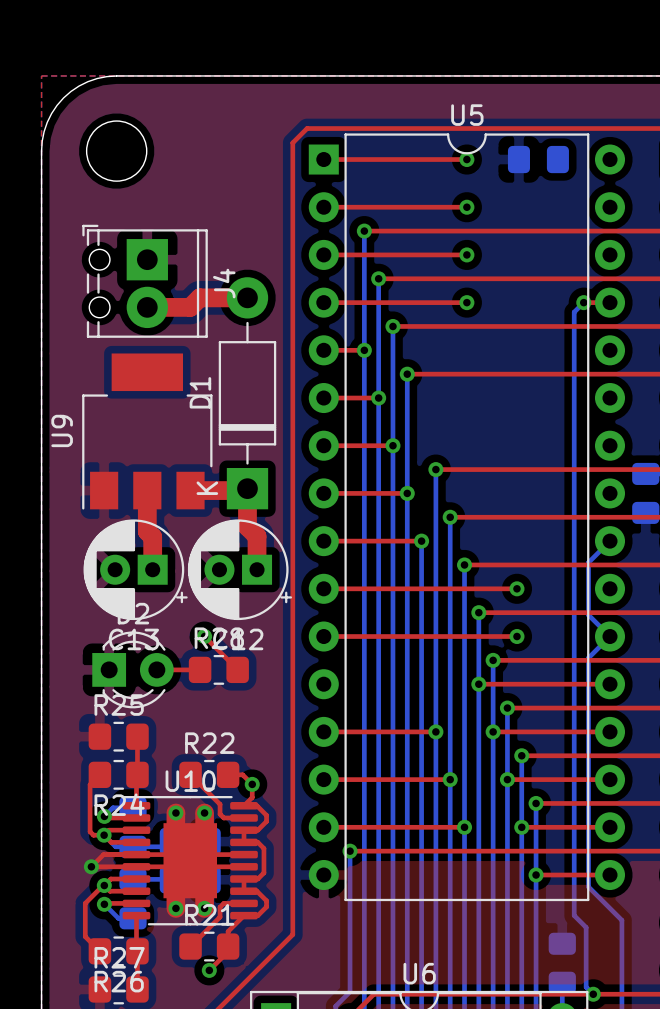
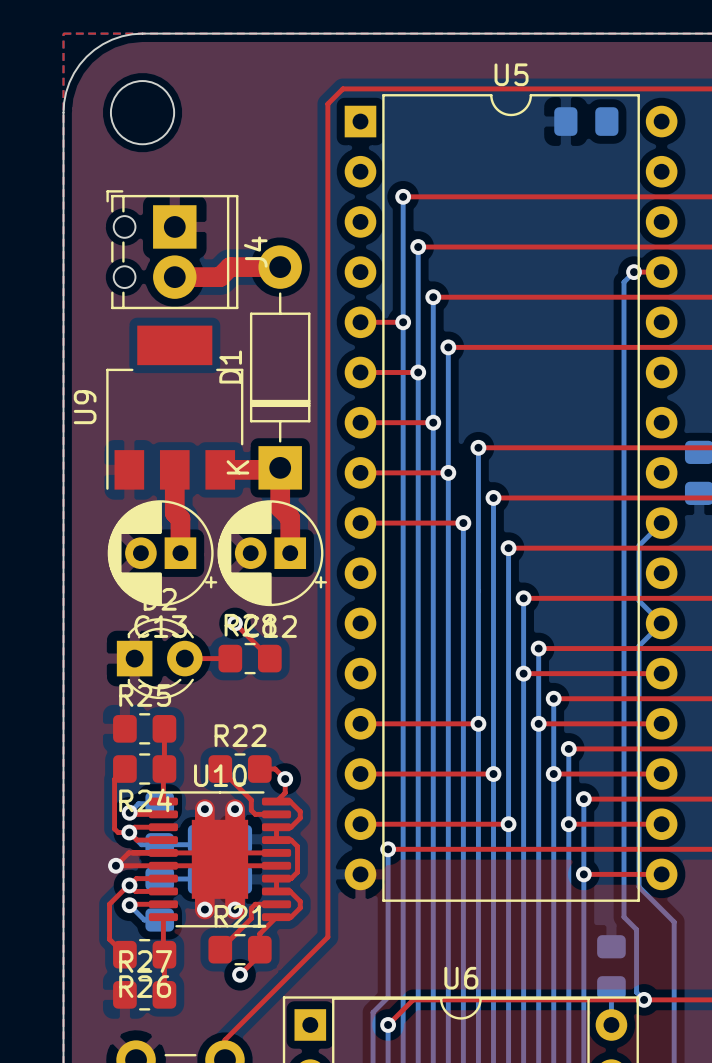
top track: (323, 159) (466, 159) -> none
via: (466, 159) -> none
top track: (323, 207) (466, 207) -> none
via: (466, 207) -> none
top track: (323, 254) (466, 254) -> none
via: (466, 254) -> none
top track: (323, 302) (466, 302) -> none
via: (466, 302) -> none
top track: (323, 588) (516, 588) -> none
via: (516, 588) -> none
top track: (323, 636) (516, 636) -> none
via: (516, 636) -> none

